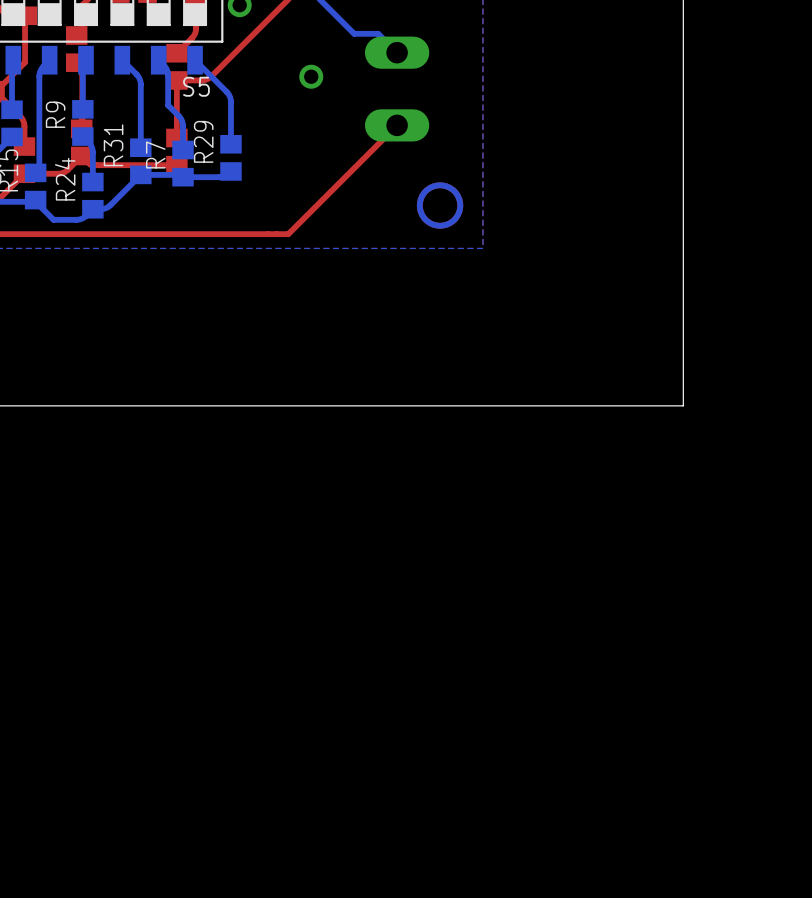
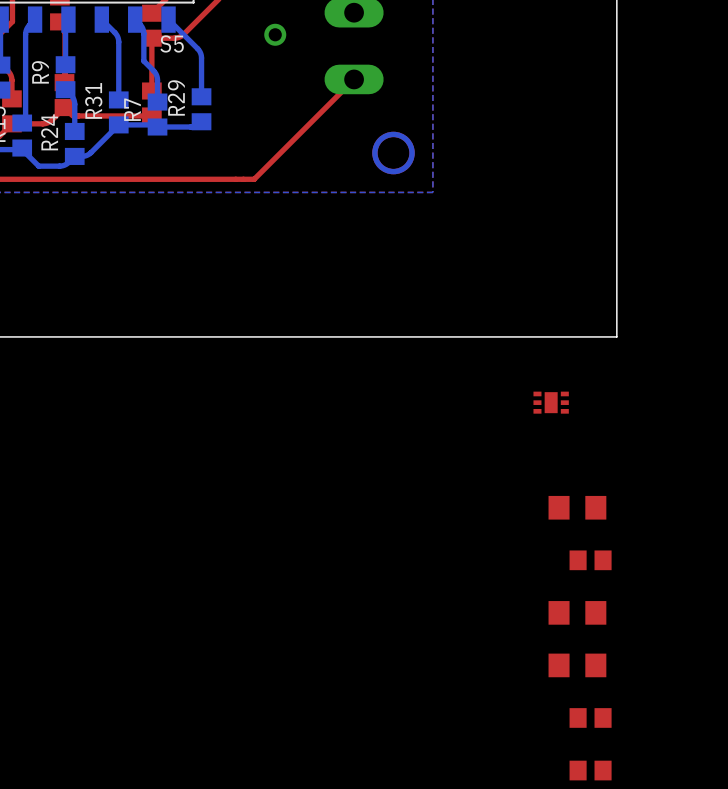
part: none -> (551, 402)
part: none -> (577, 507)
part: none -> (590, 560)
part: none -> (577, 612)
part: none -> (577, 665)
part: none -> (590, 717)
part: none -> (590, 770)

